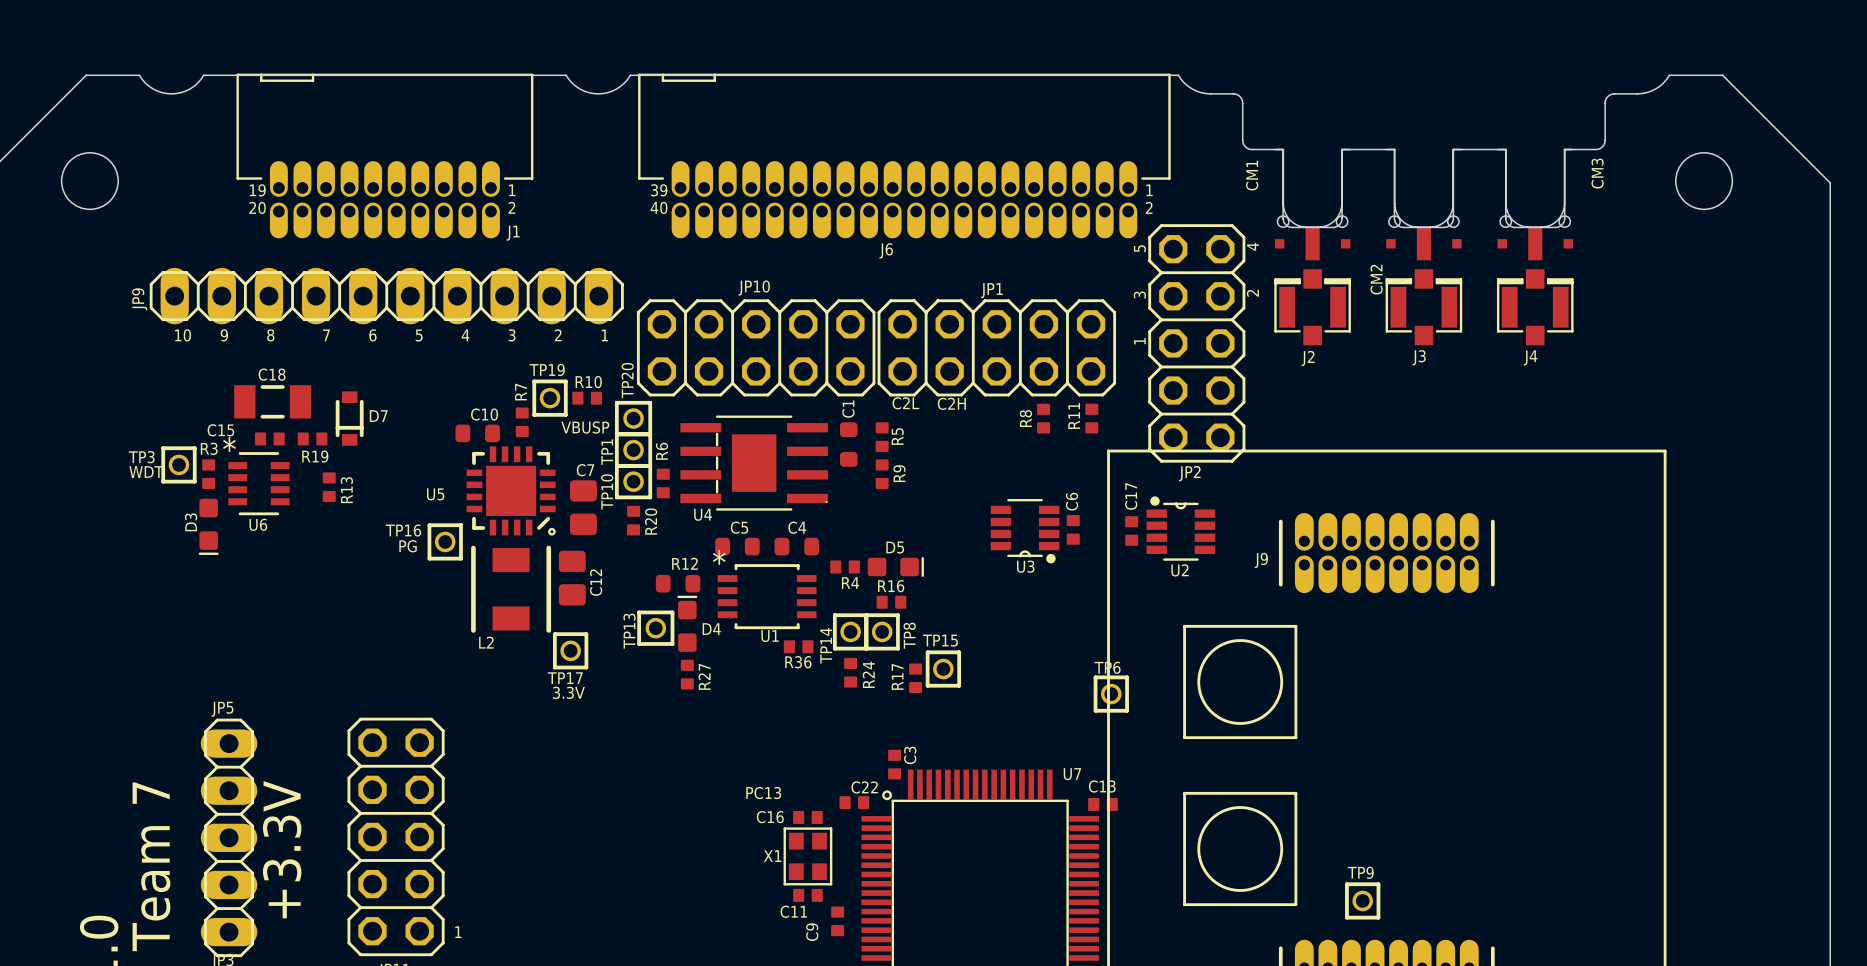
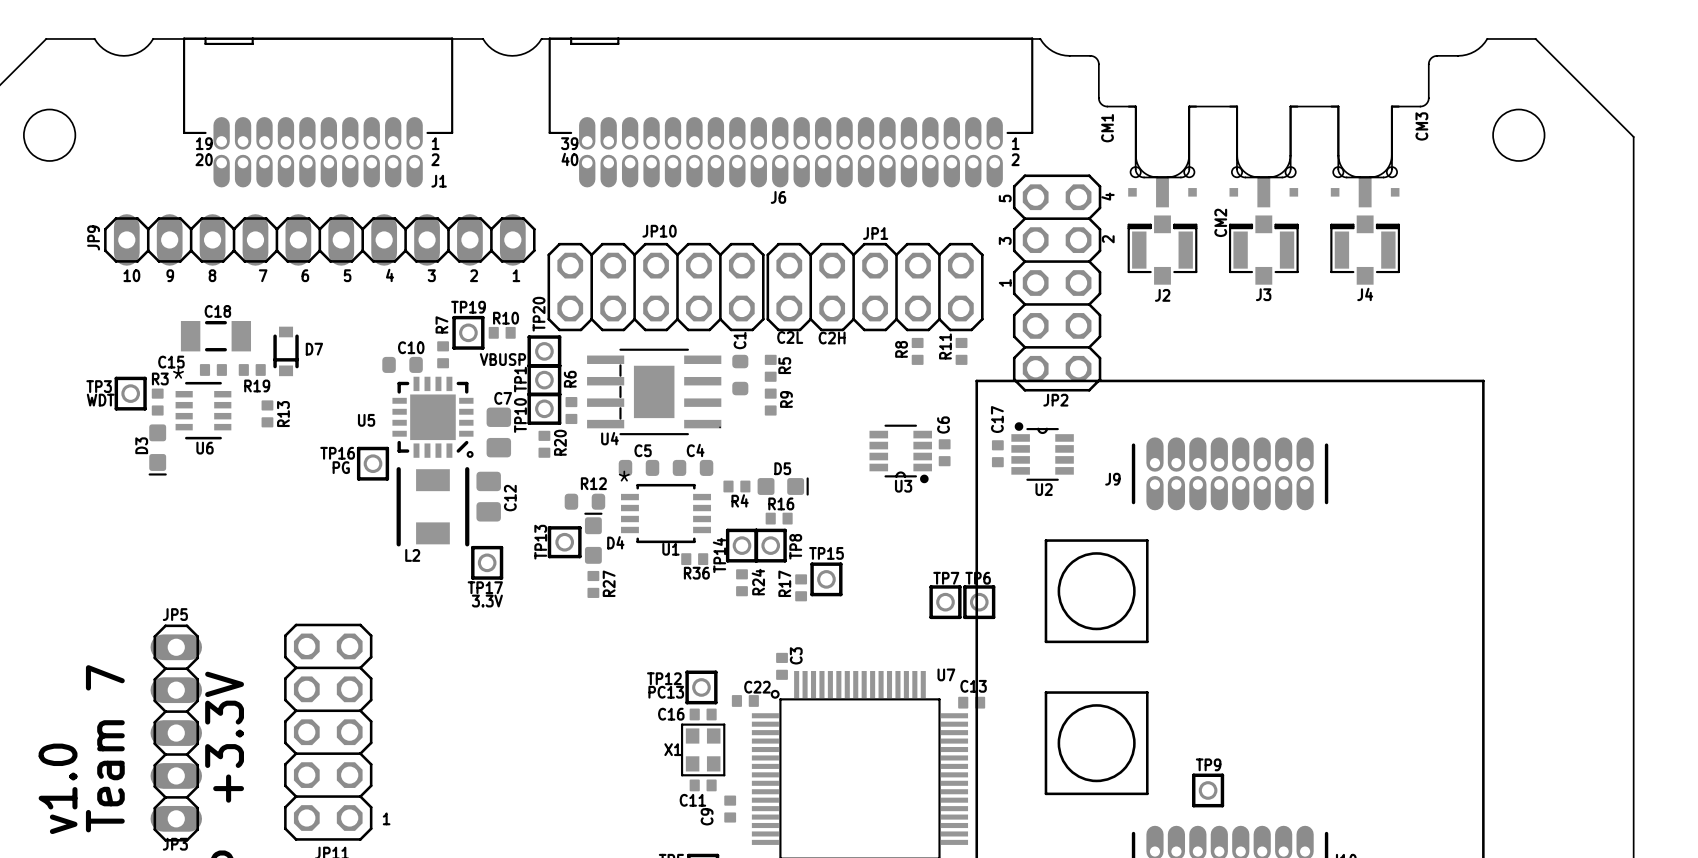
TP7: none -> (945, 602)
TP12: none -> (701, 687)

